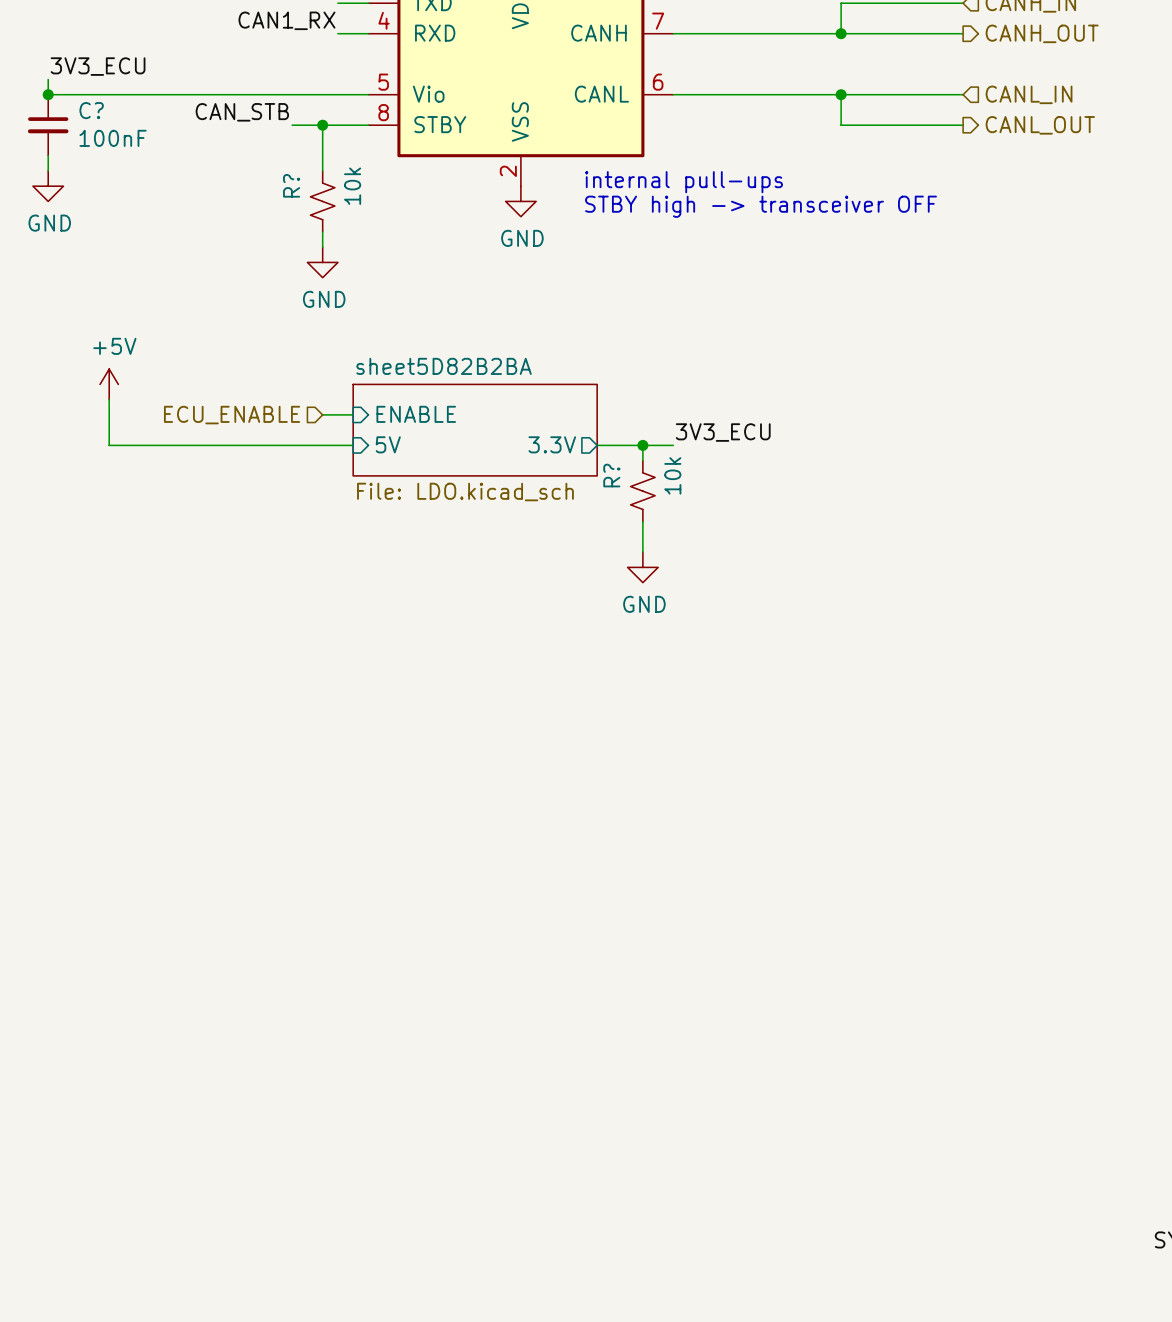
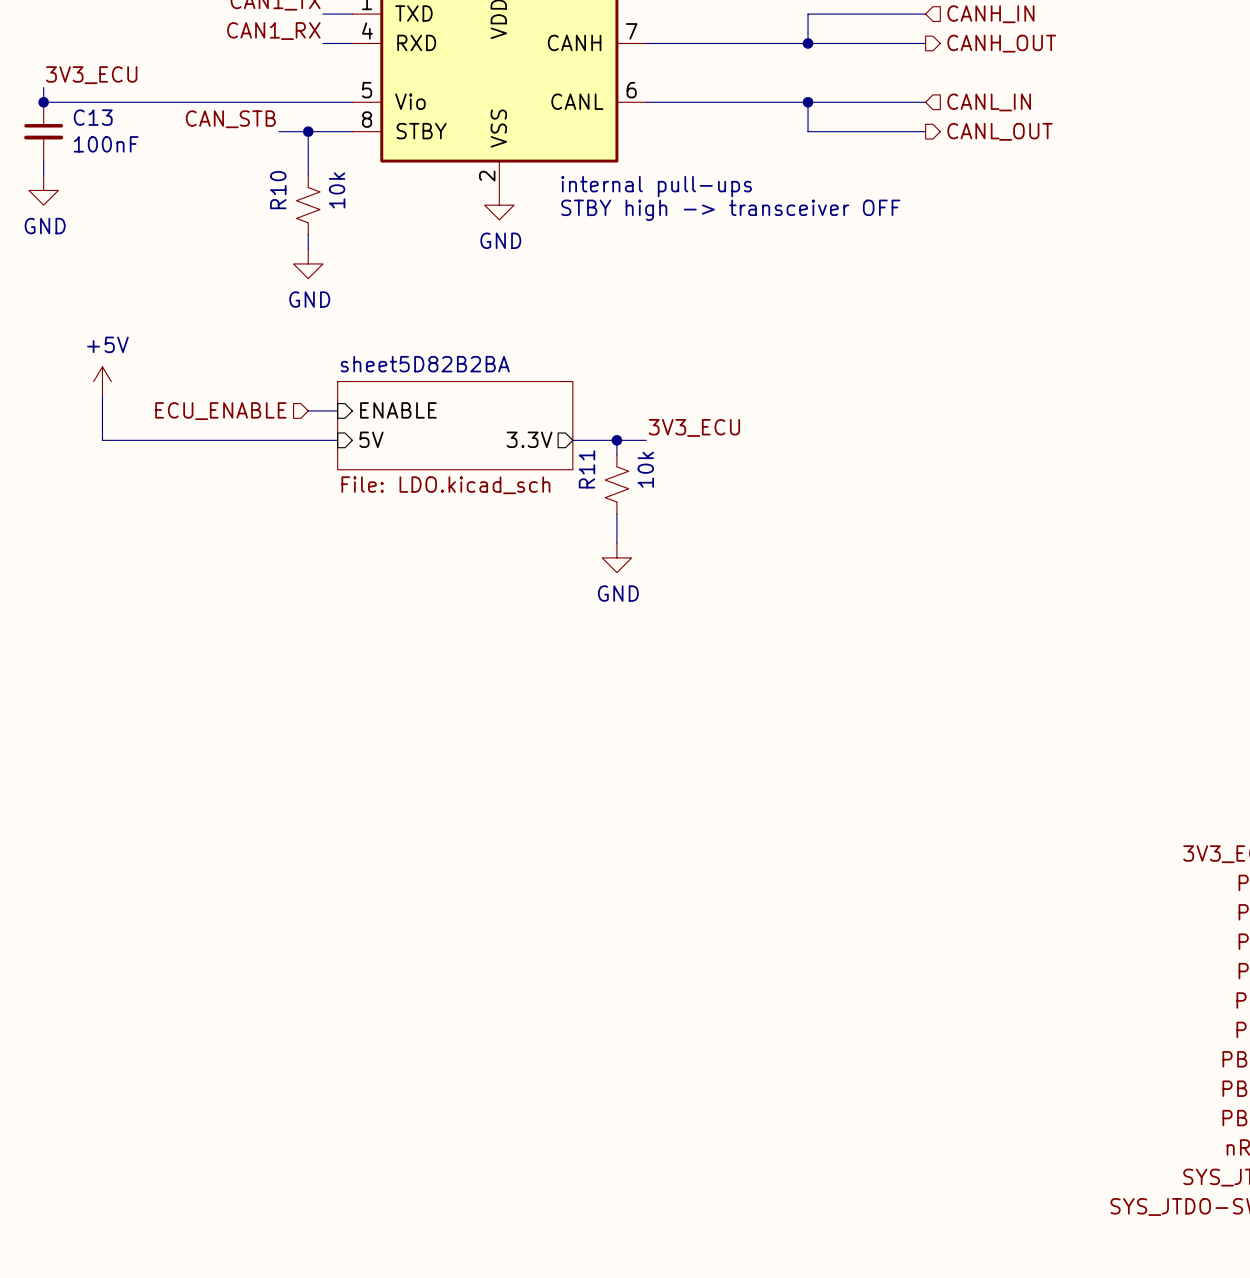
C? name: C? (91, 110) -> C13 (93, 117)
R? name: R? (291, 185) -> R10 (278, 190)
R? name: R? (611, 475) -> R11 (586, 469)

